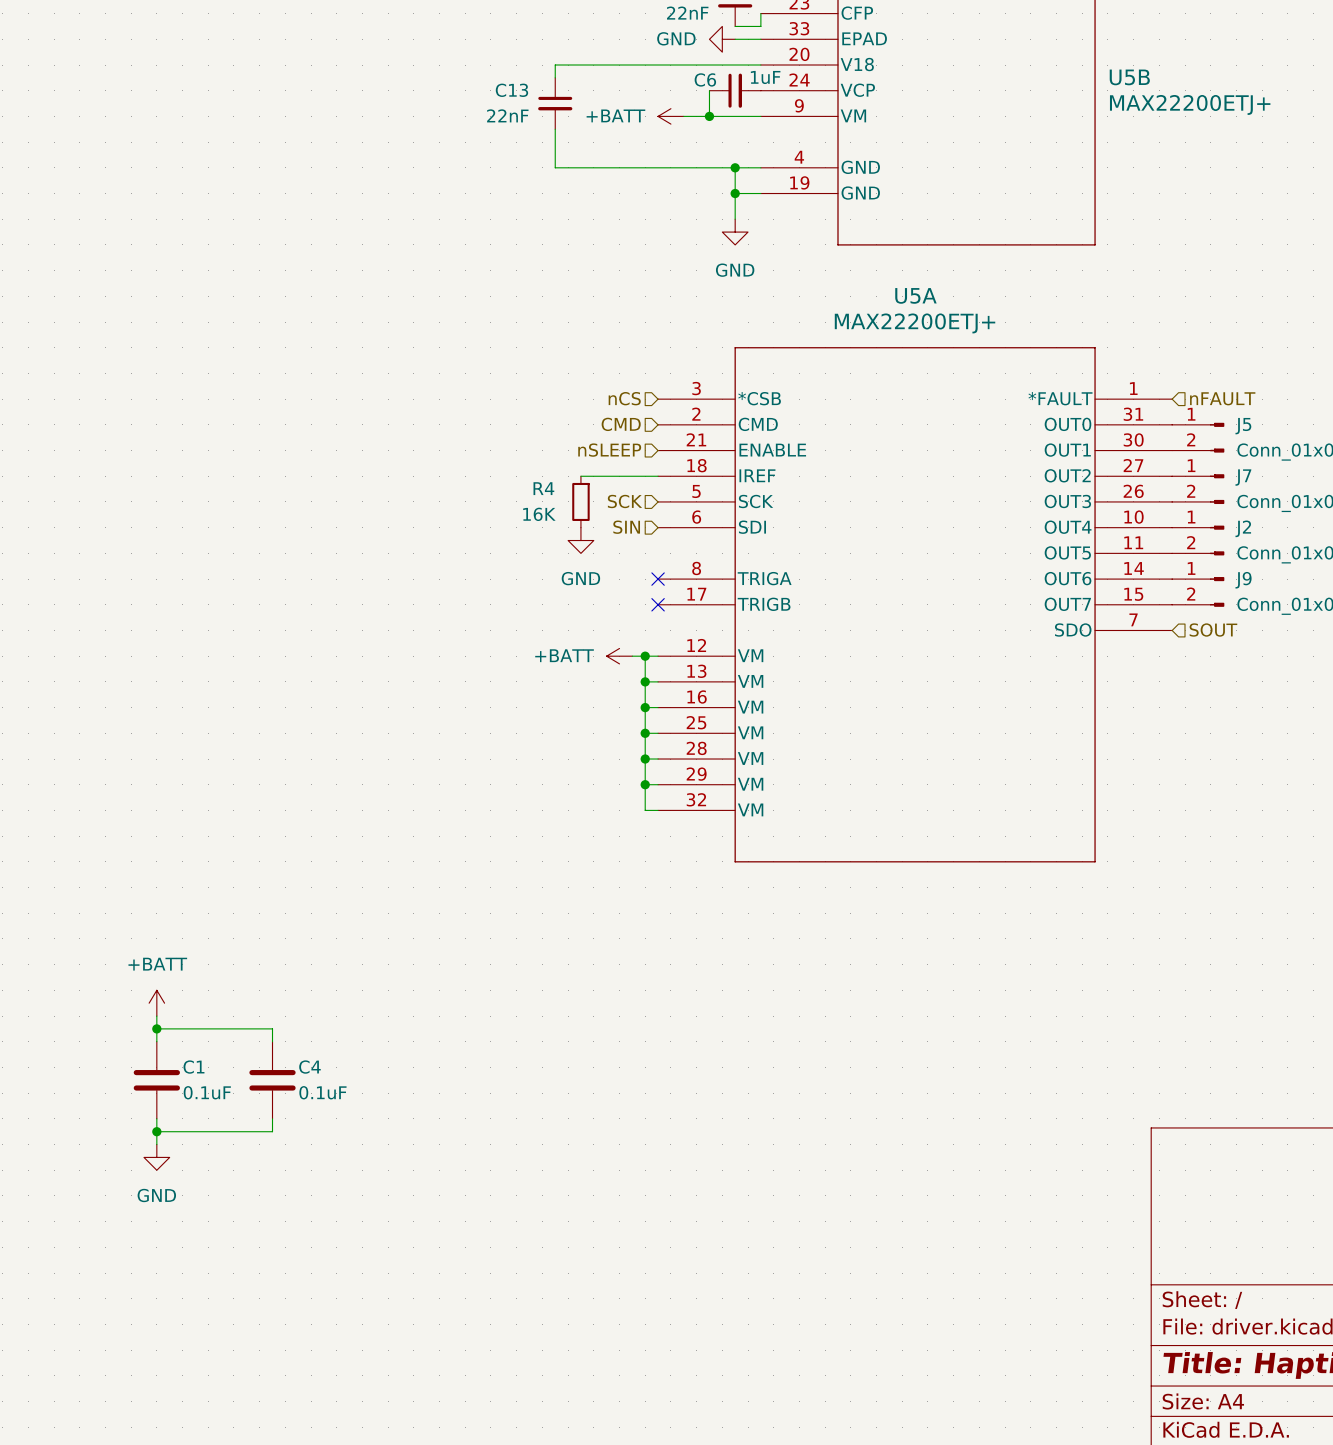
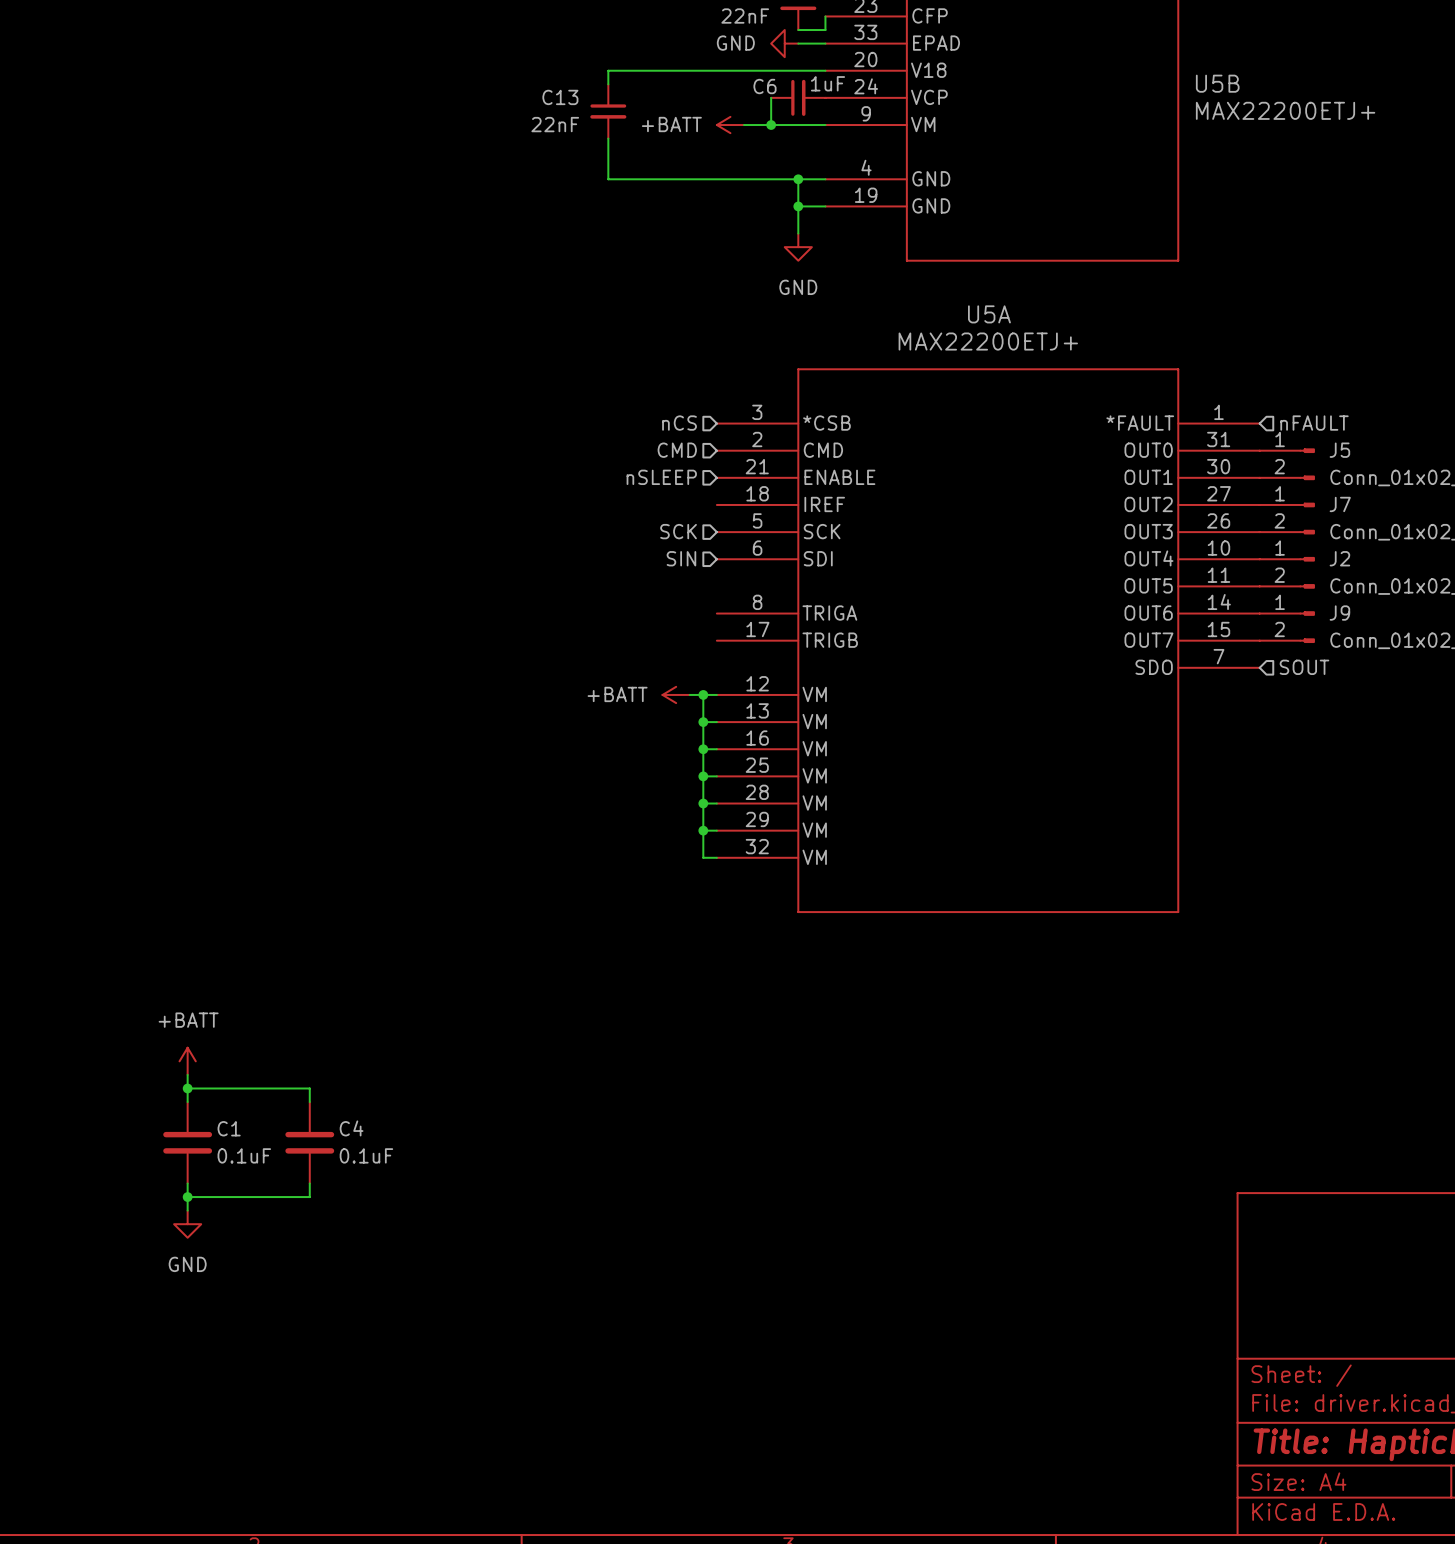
wire: (580, 476) (658, 476) -> none
R4: 16K (580, 501) -> none
power symbol: GND (580, 540) -> none
no-connect mark: (658, 579) -> none
no-connect mark: (658, 604) -> none

